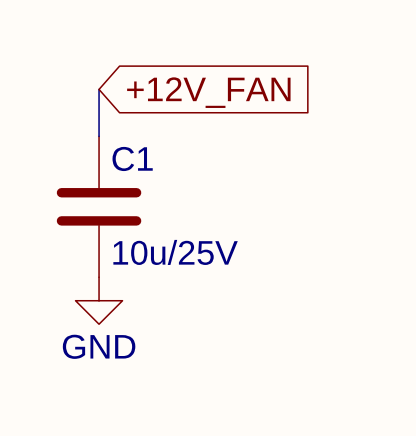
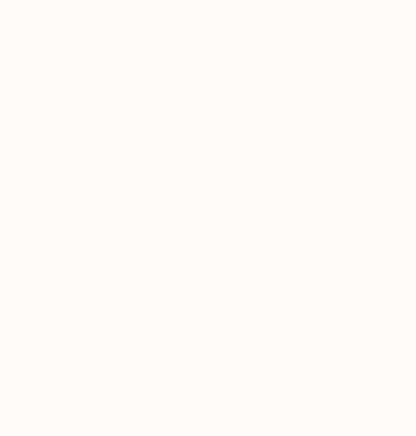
wire: (99, 89) (99, 136) -> none
global label: +12V_FAN (208, 92) -> none
C1: 10u/25V (99, 206) -> none
power symbol: GND (99, 300) -> none

